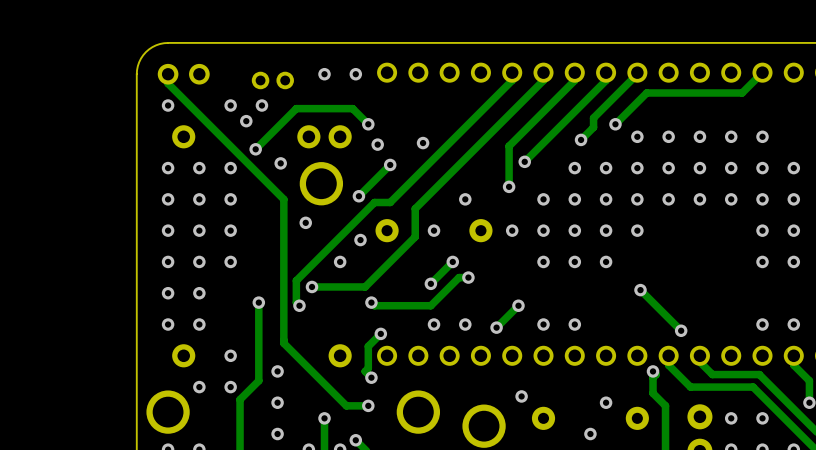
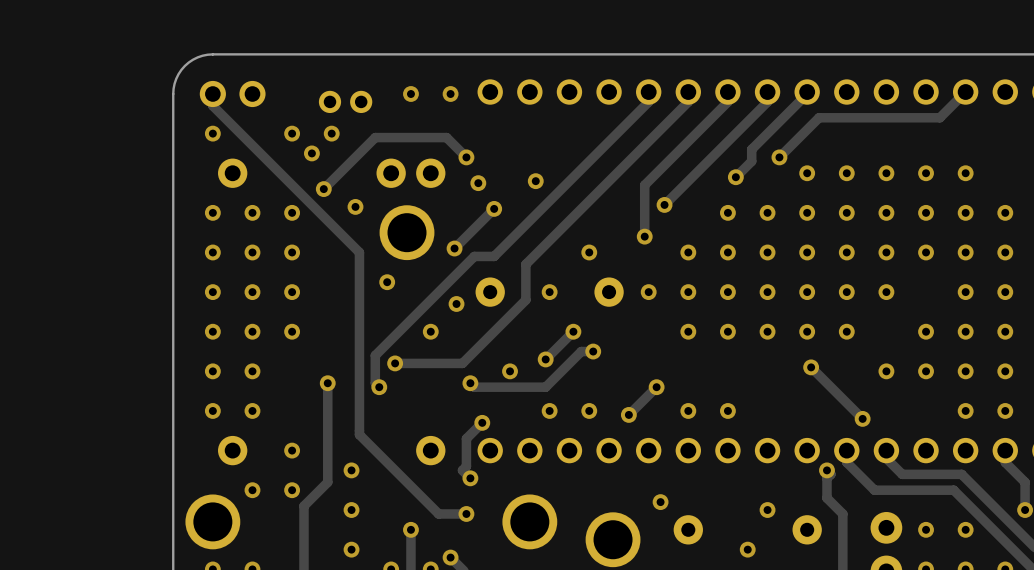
via: none -> (846, 292)
via: none -> (886, 292)
via: none -> (807, 331)
via: none -> (846, 331)
via: none -> (926, 331)
via: none -> (510, 371)
via: none -> (886, 371)
via: none -> (926, 371)
via: none -> (965, 371)
via: none -> (1005, 371)

